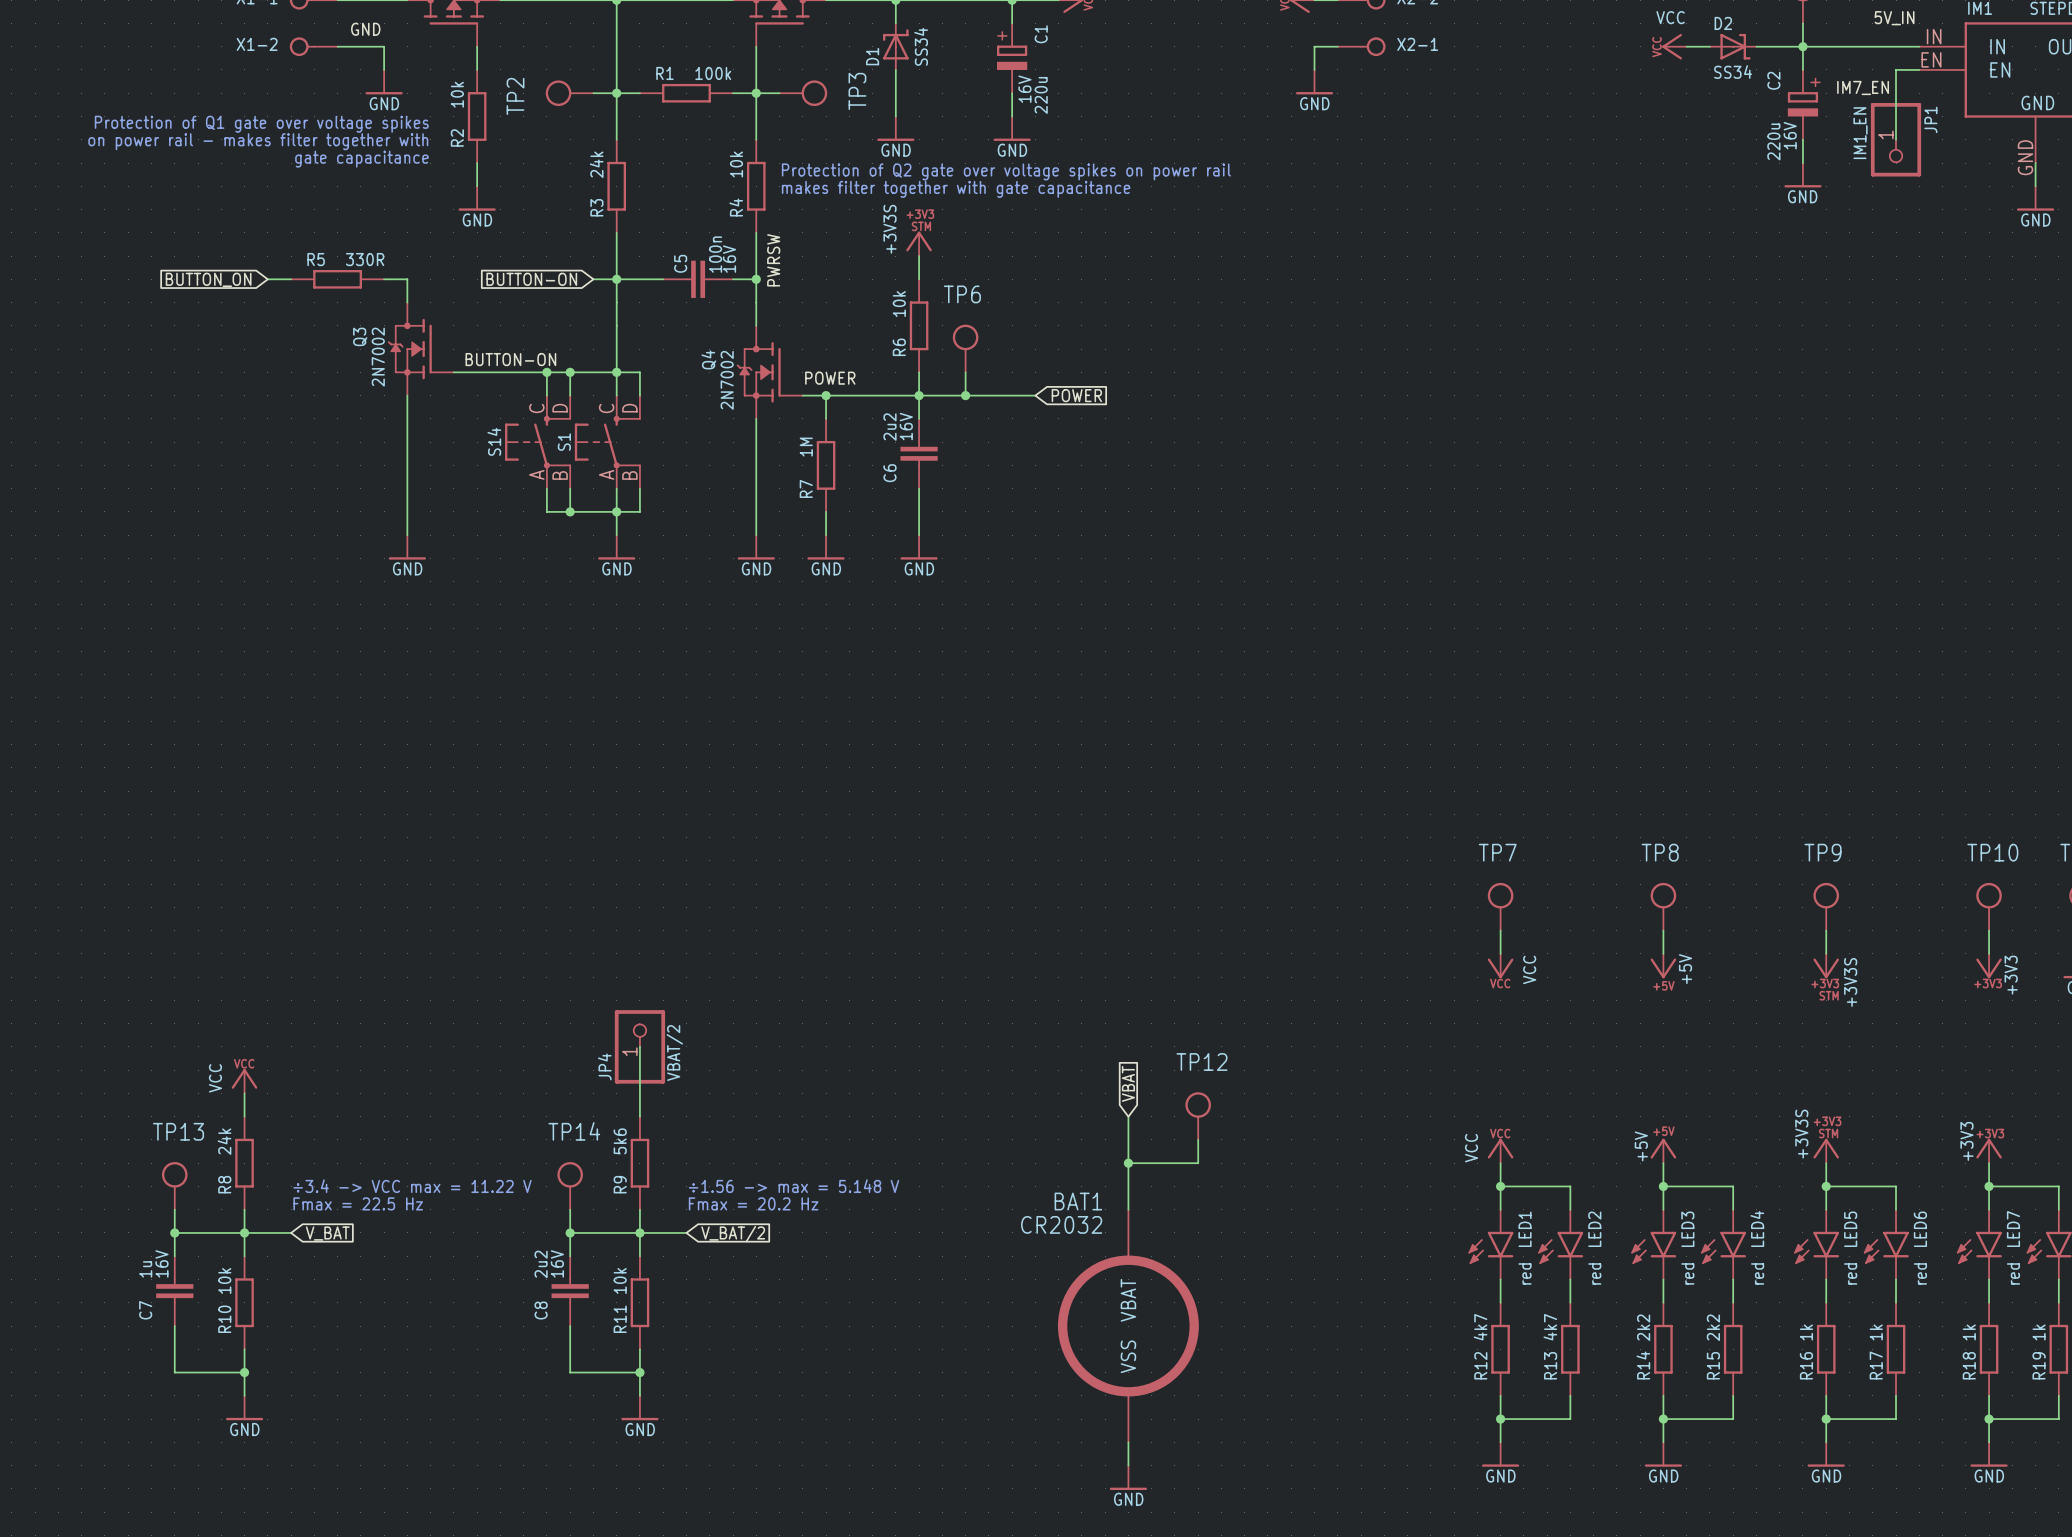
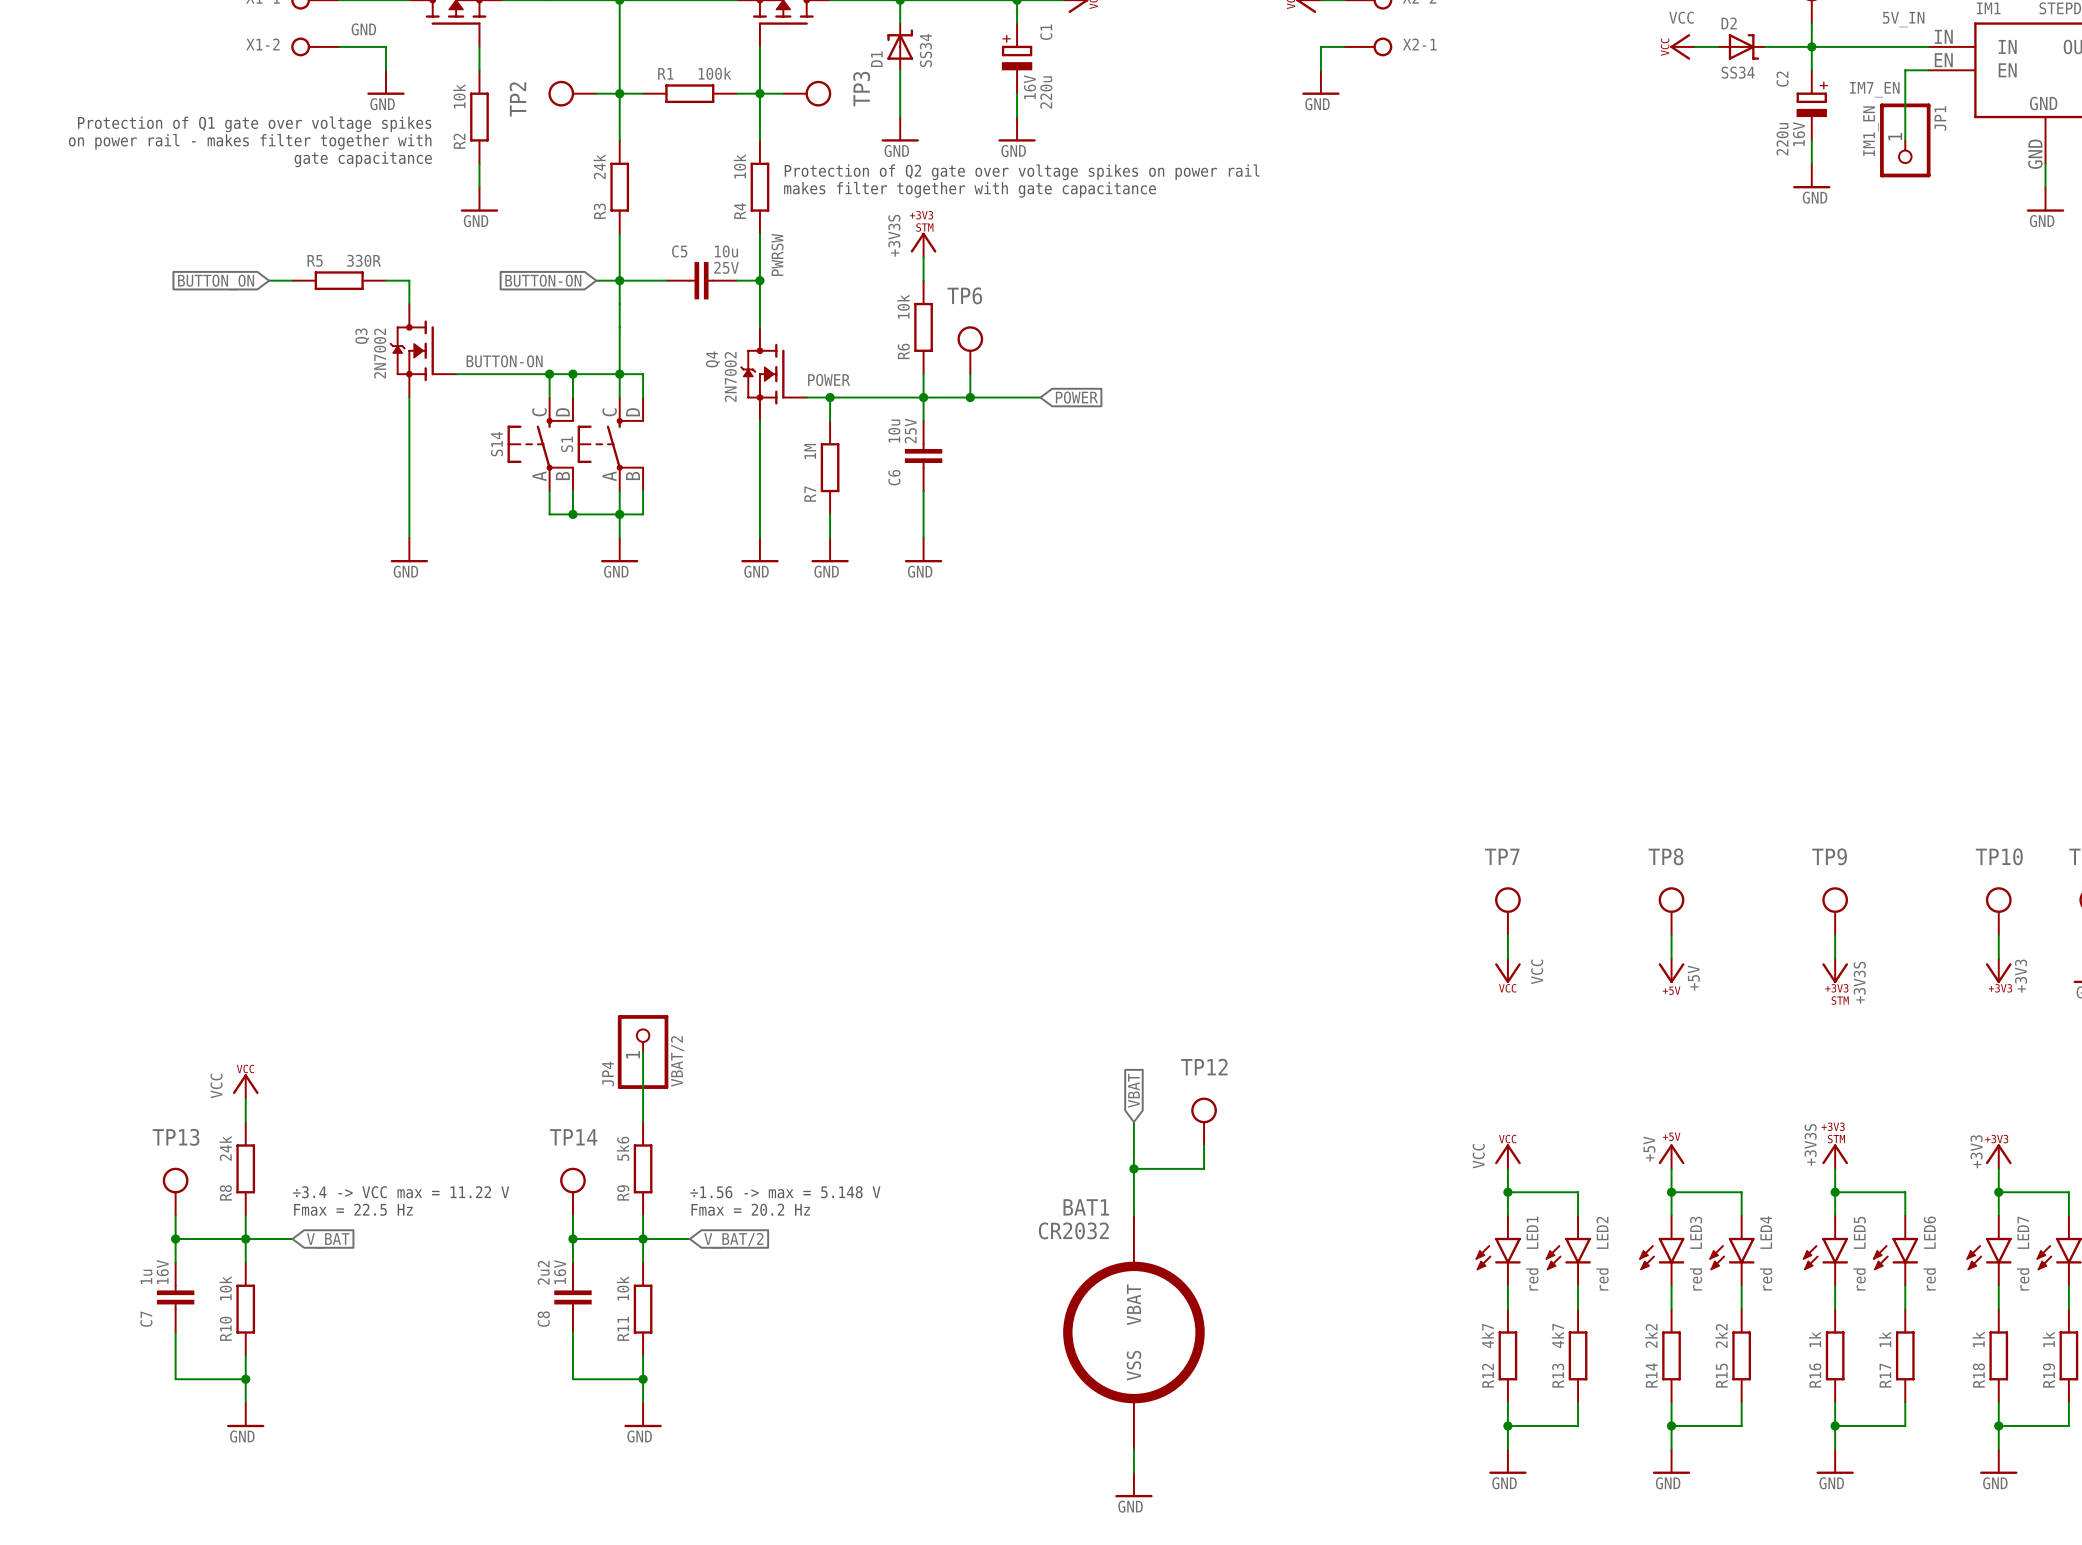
C5 value: 100n (715, 254) -> 10u (726, 251)
C5 text: 16V (729, 259) -> 25V (726, 267)
C5 name rotation: 0° (680, 263) -> 90° clockwise (679, 251)
C6 text: 16V (906, 426) -> 25V (910, 430)
C6 value: 2u2 (890, 427) -> 10u (894, 431)

